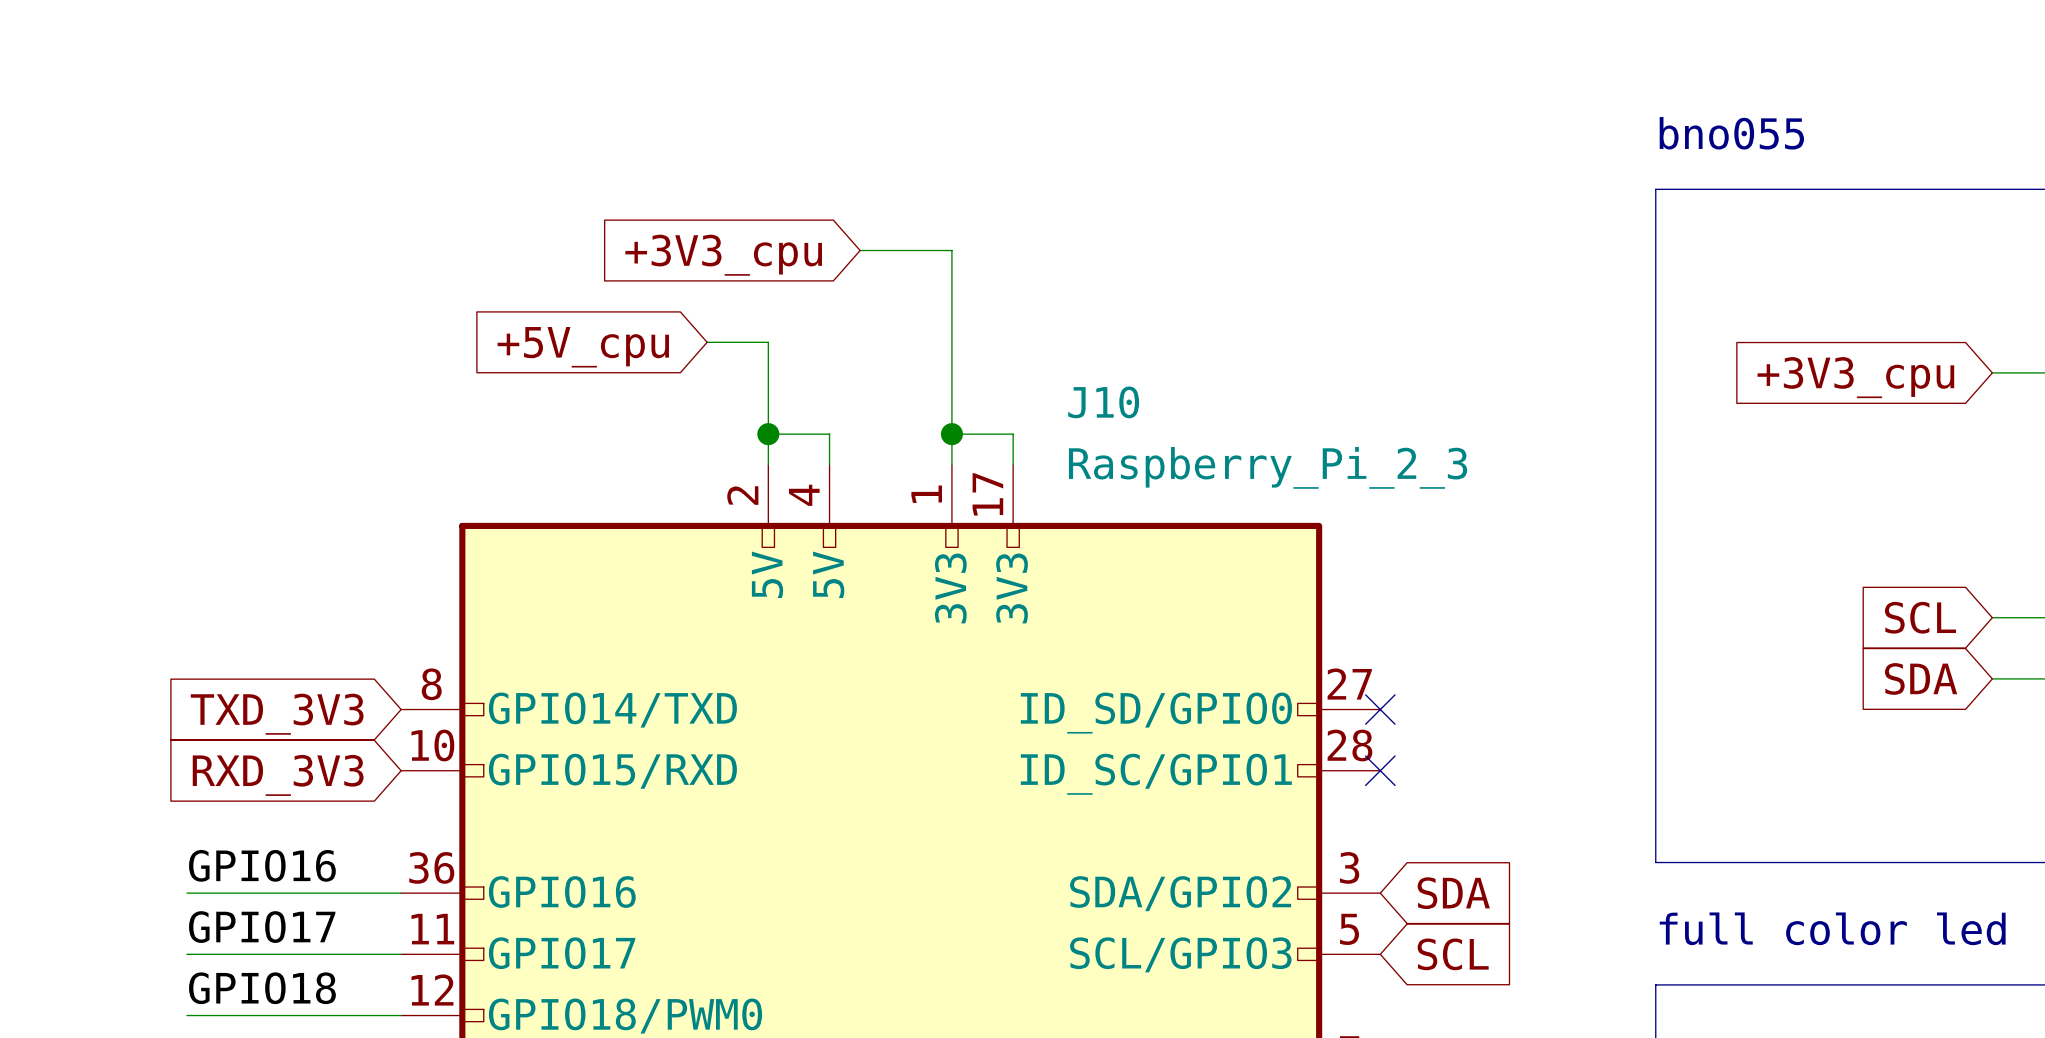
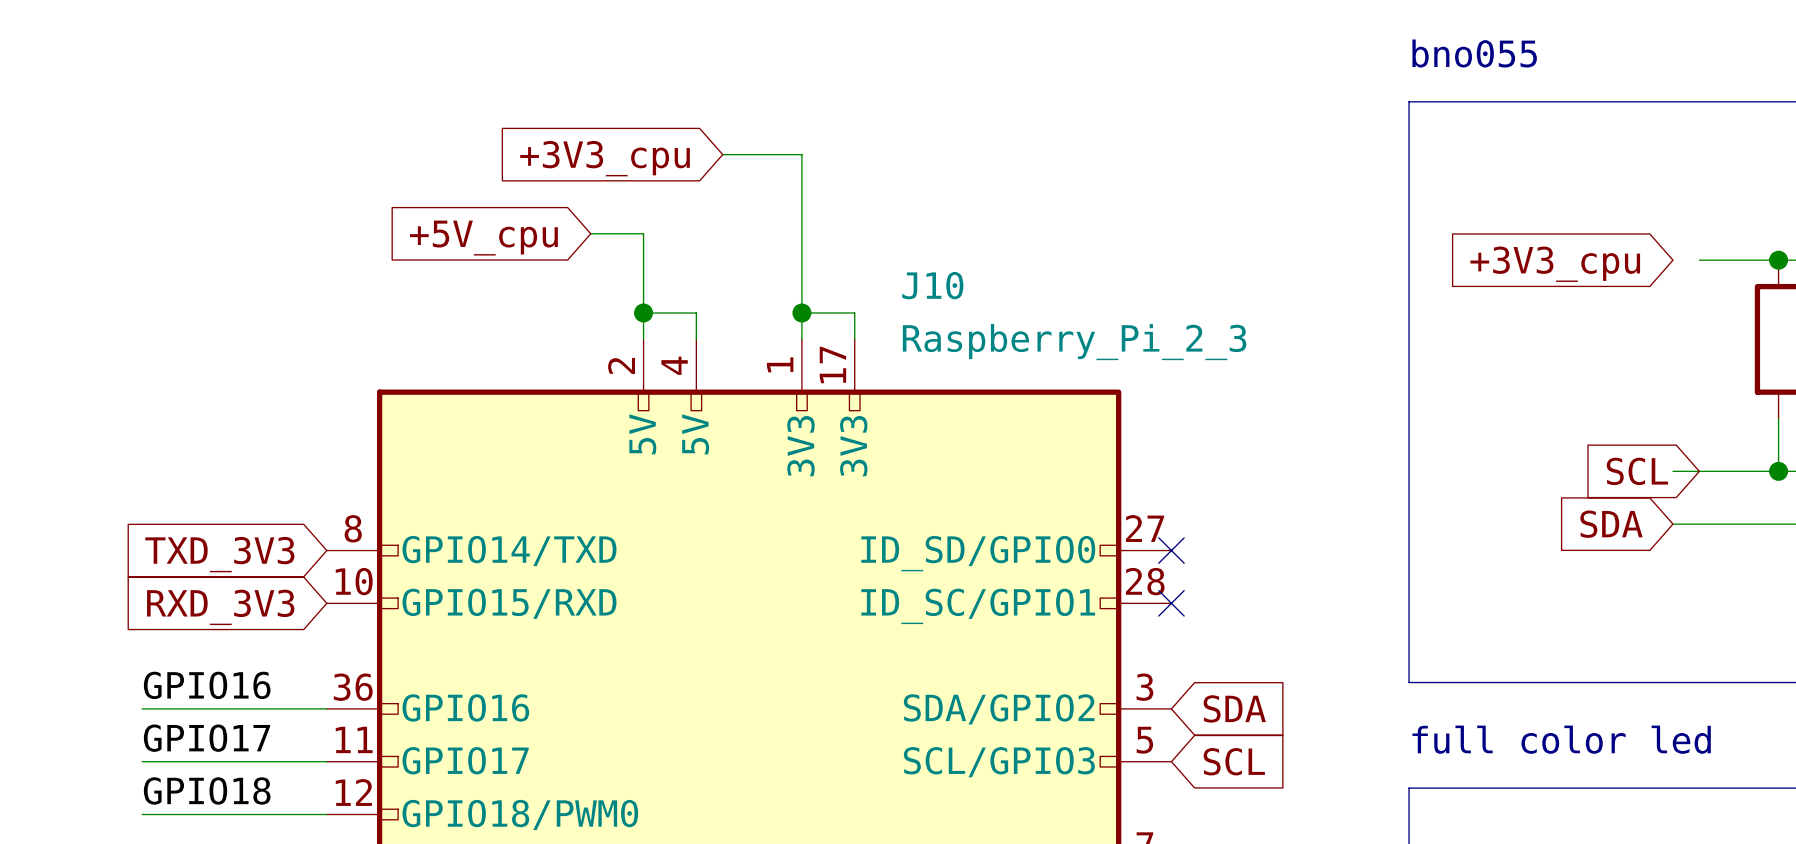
global label position: +3V3_cpu (1855, 377) -> +3V3_cpu (1555, 264)
wire: none -> (1672, 471) (1699, 471)
global label position: SDA (1921, 678) -> SDA (1611, 524)
wire: none -> (1672, 524) (1699, 524)

